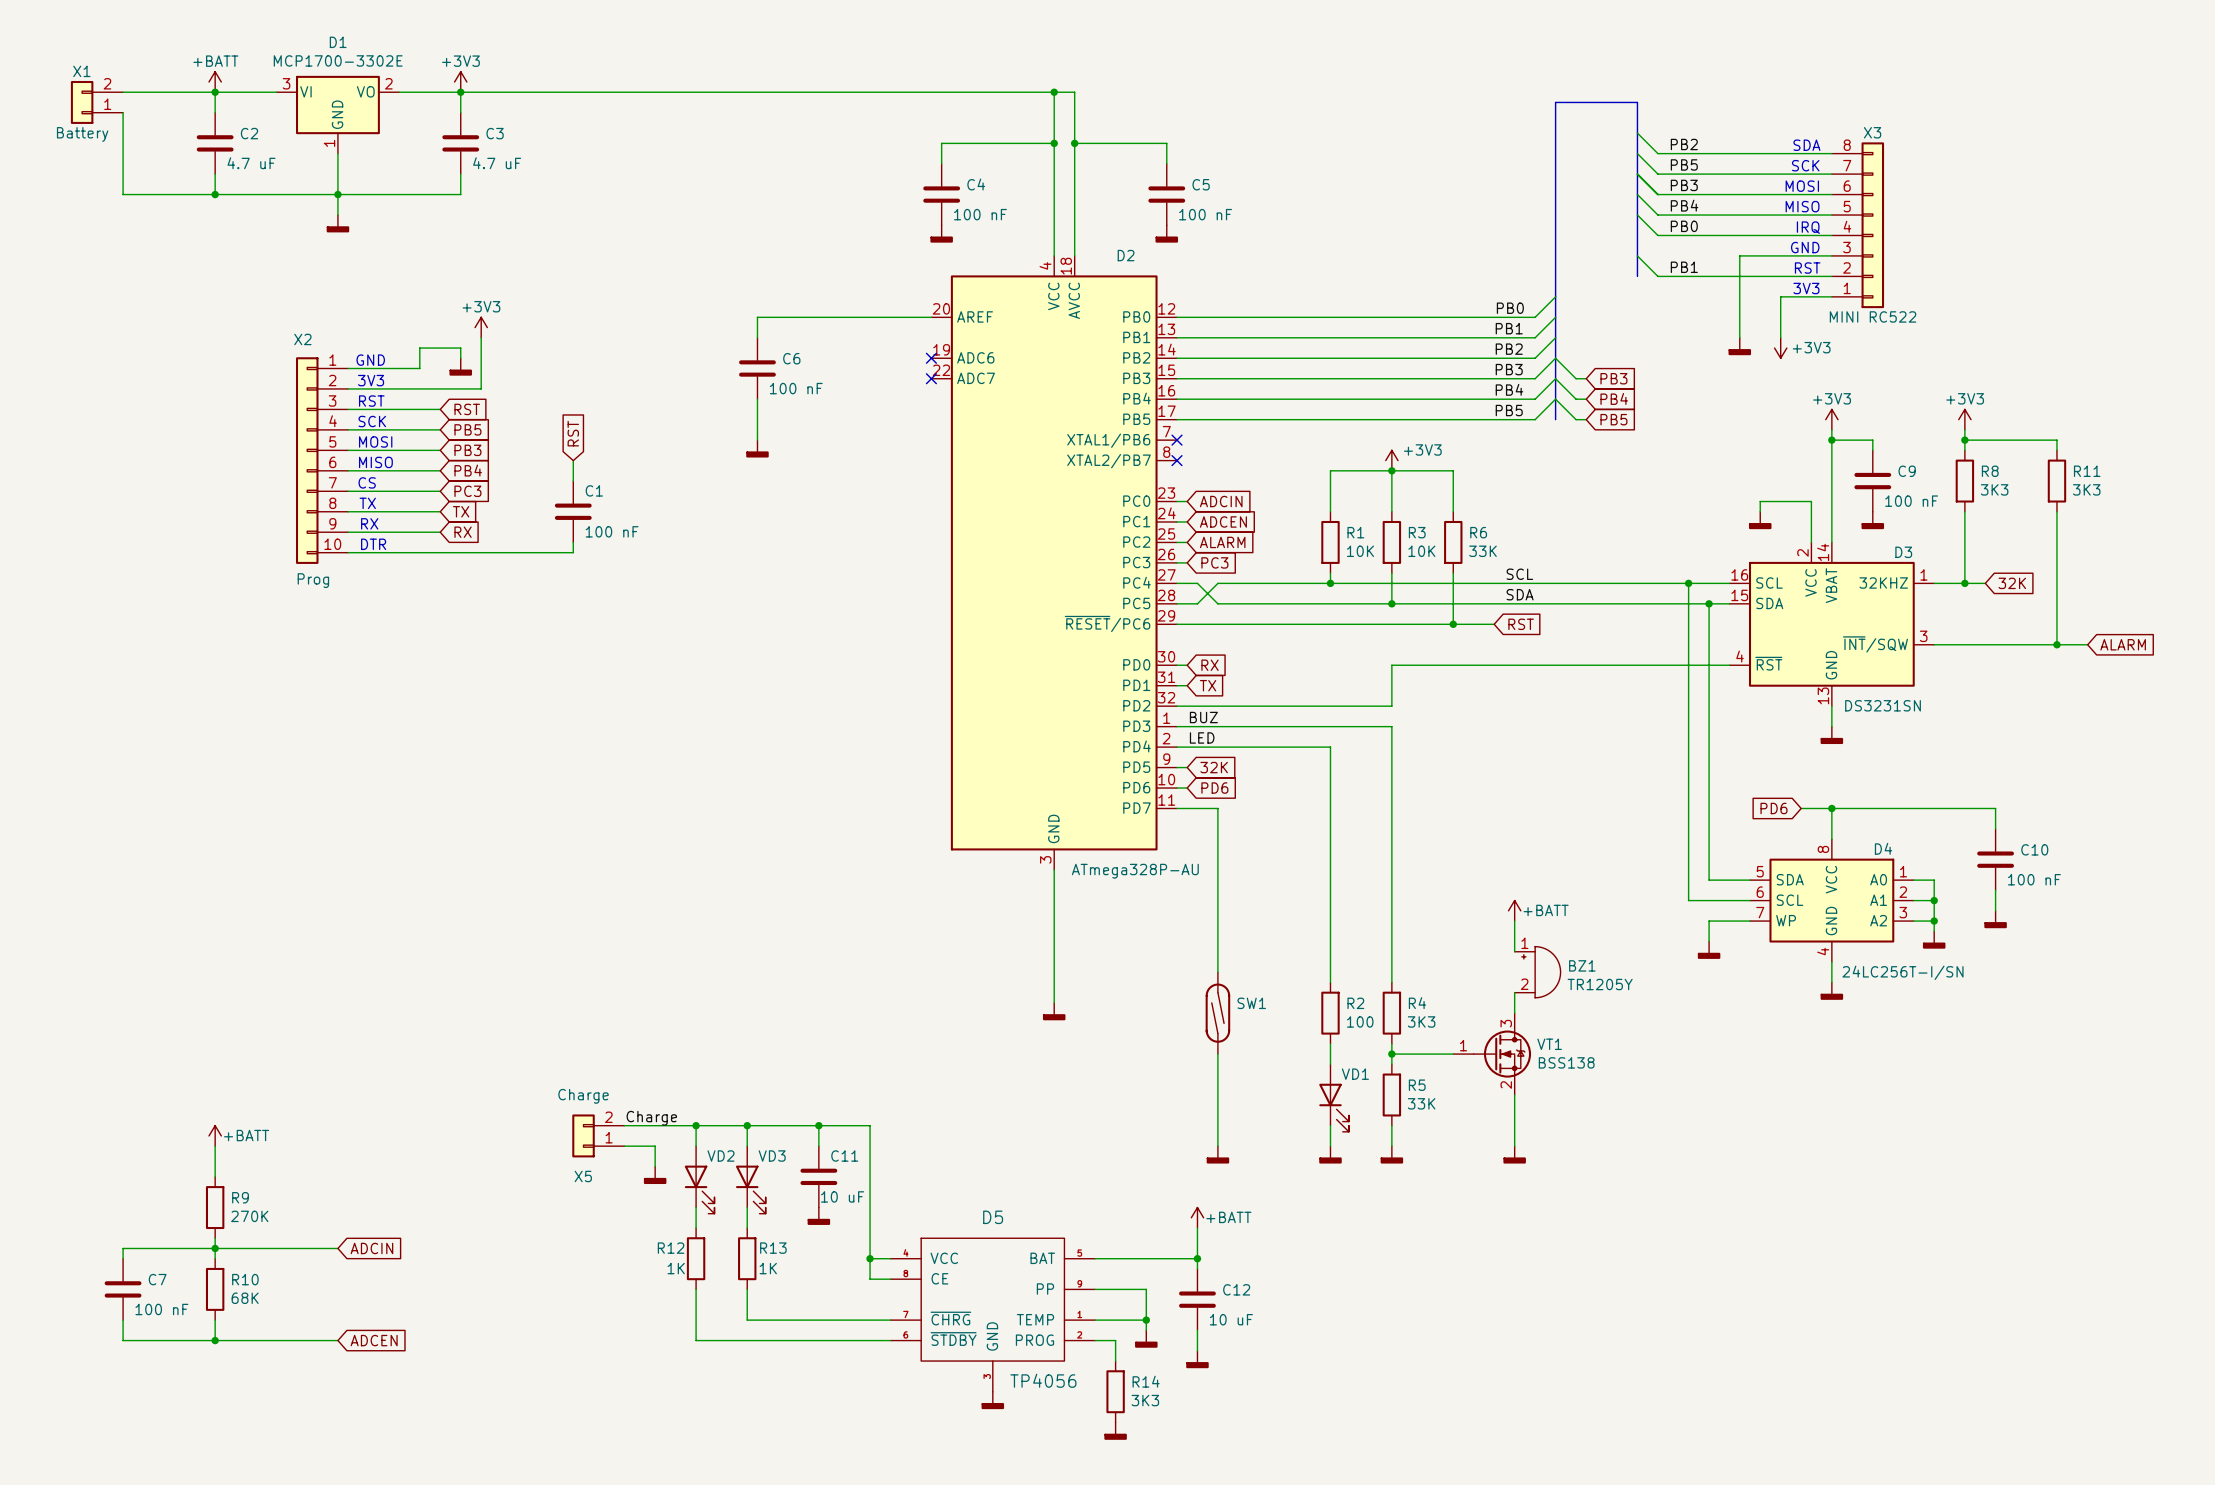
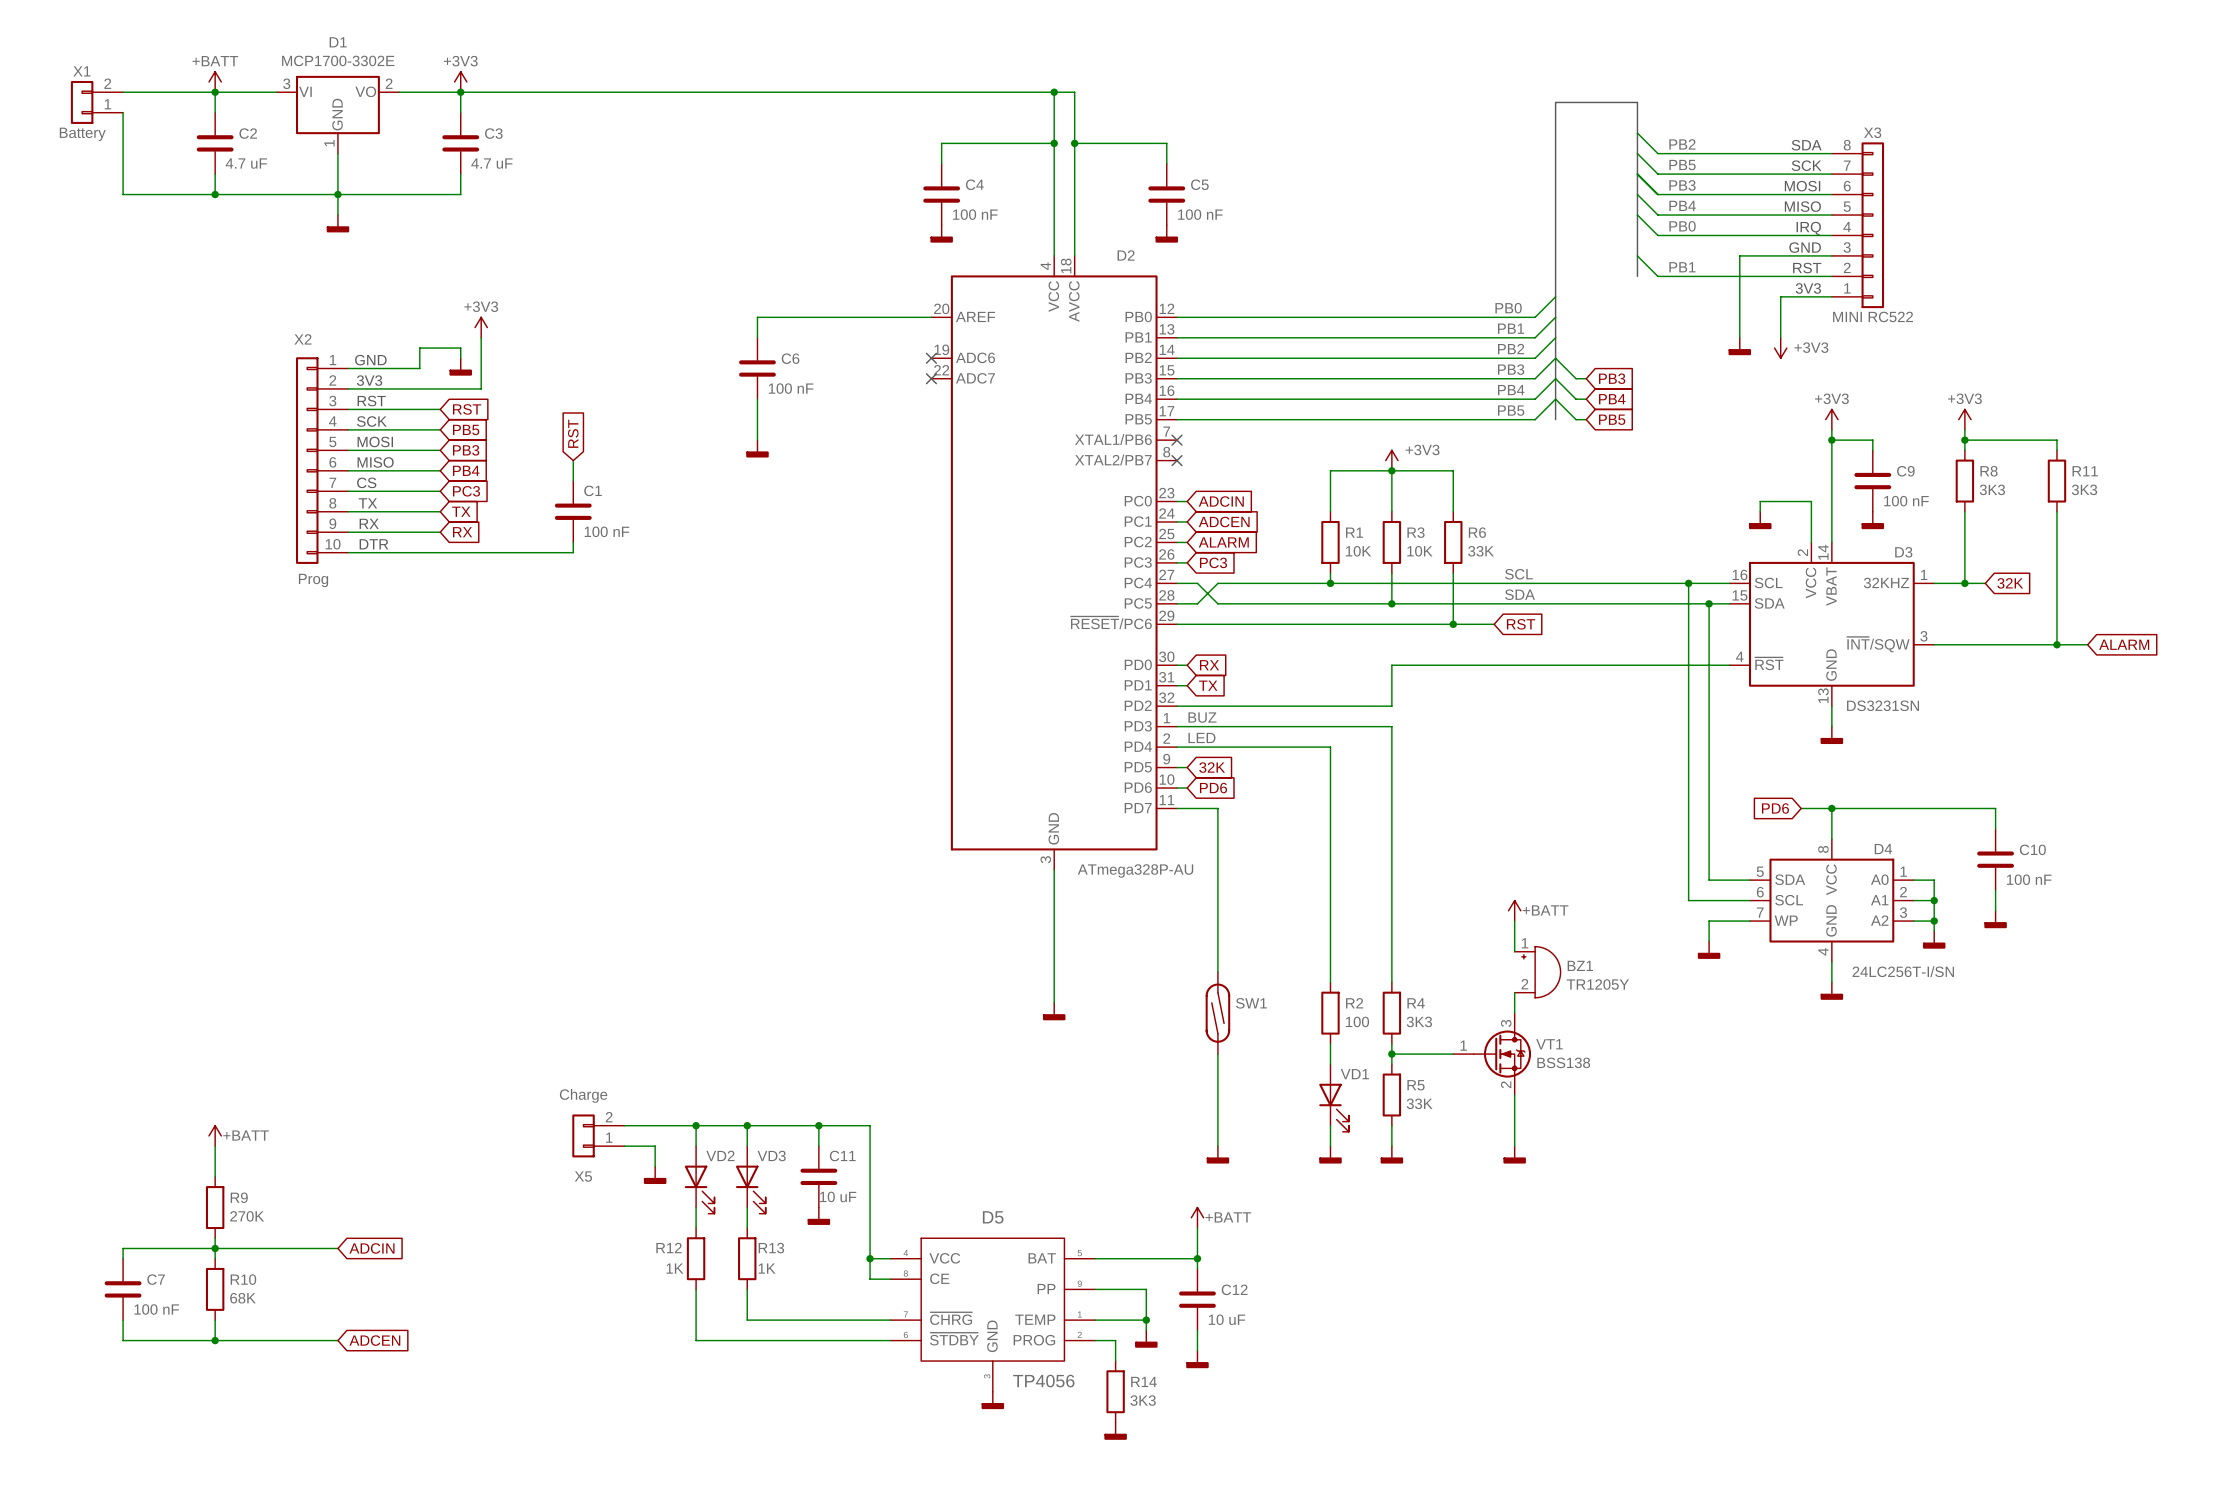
label: Charge (651, 1118) -> none

